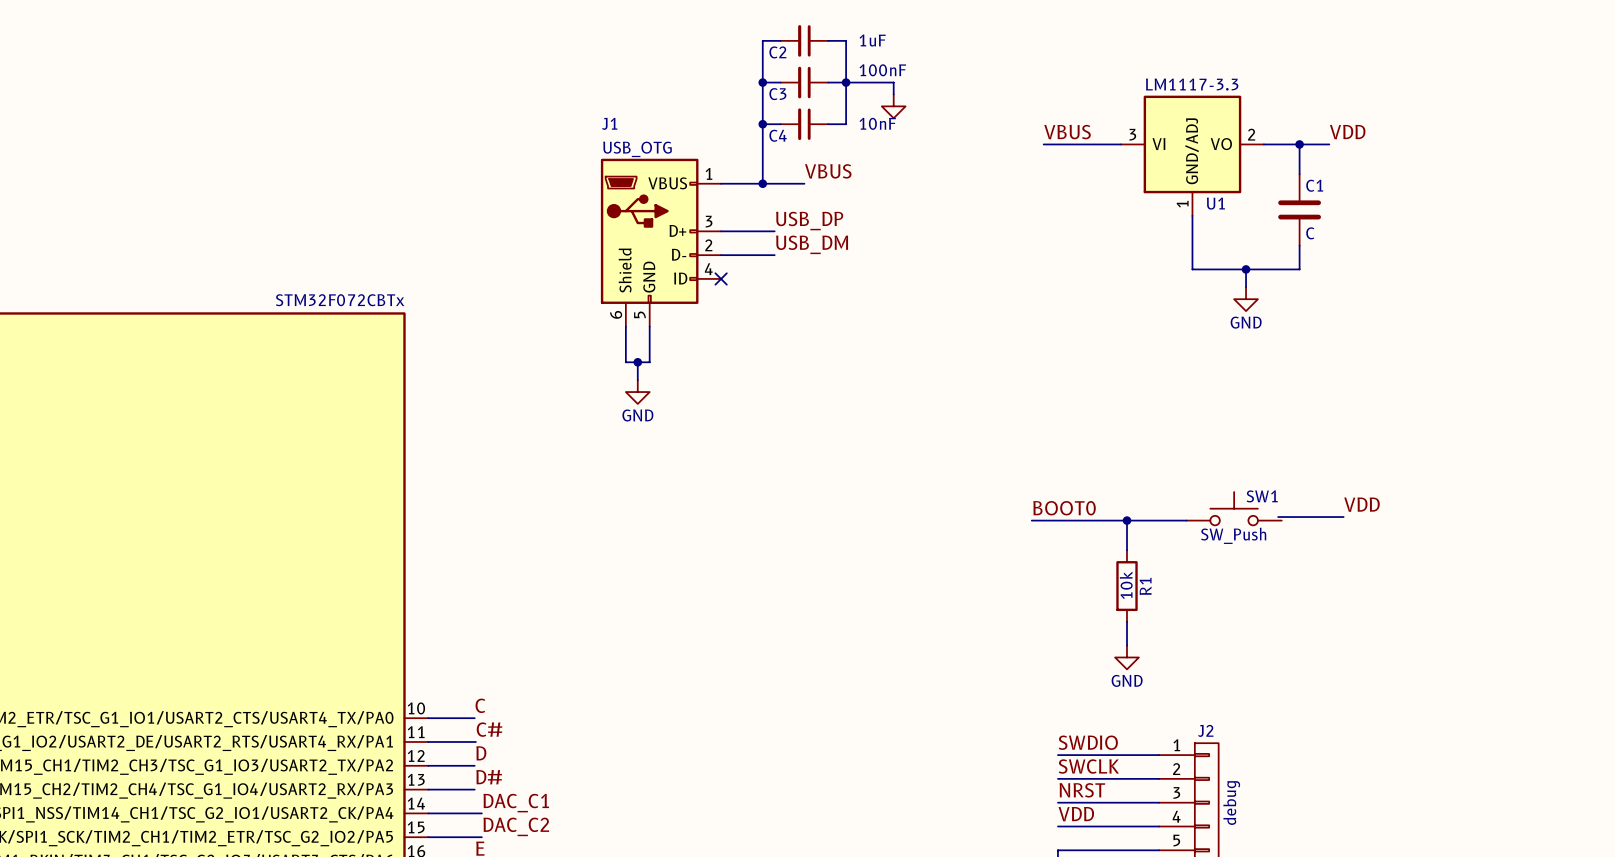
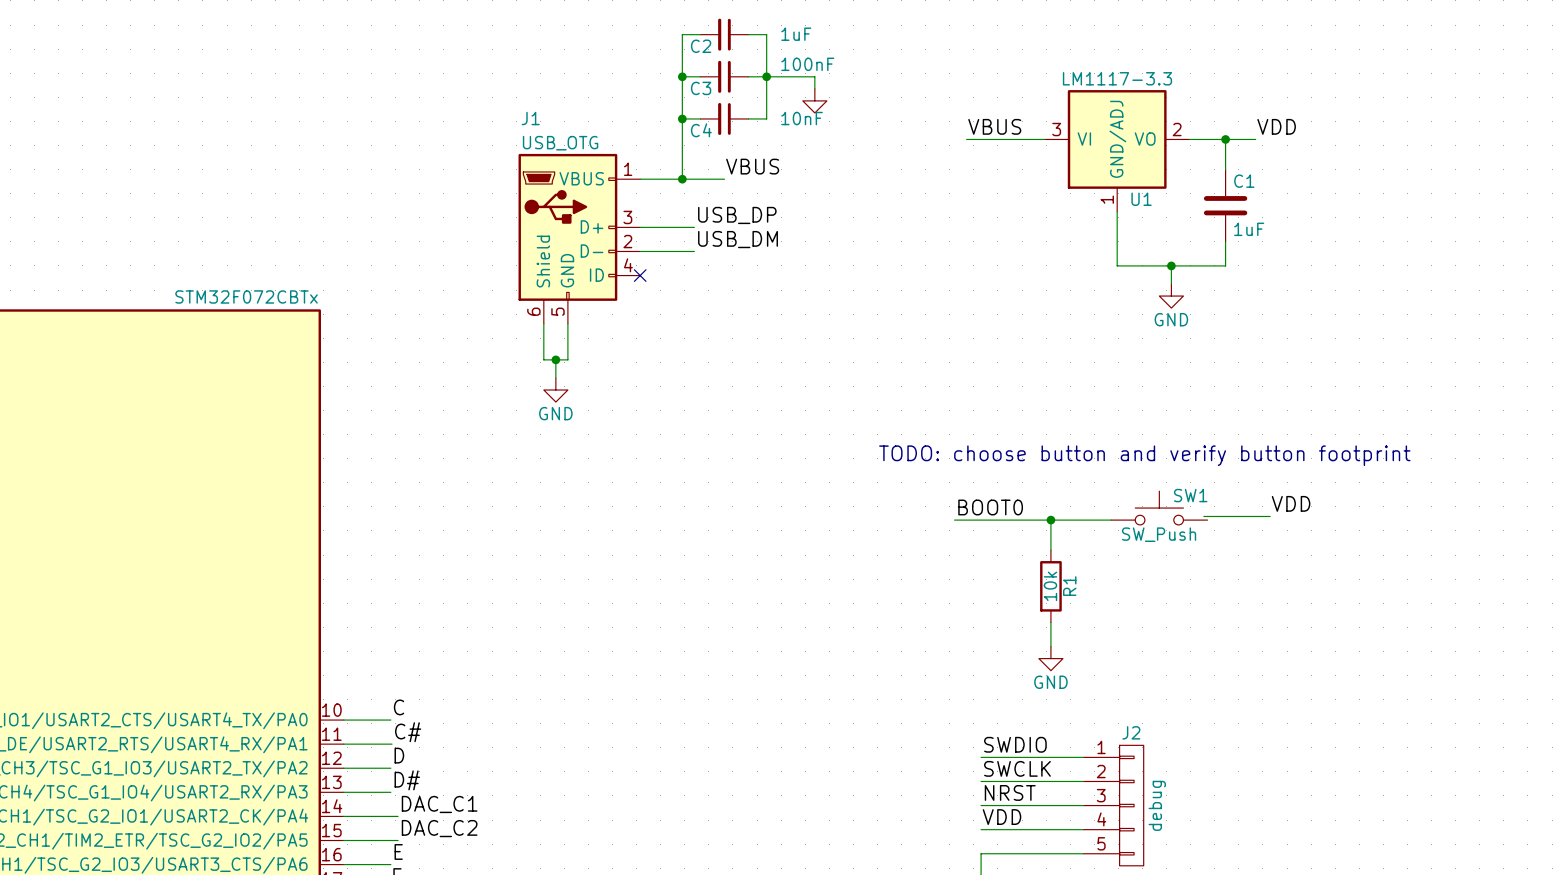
C1 value: C (1310, 233) -> 1uF (1249, 229)
text: none -> TODO: choose button and verify button footprint (1144, 455)

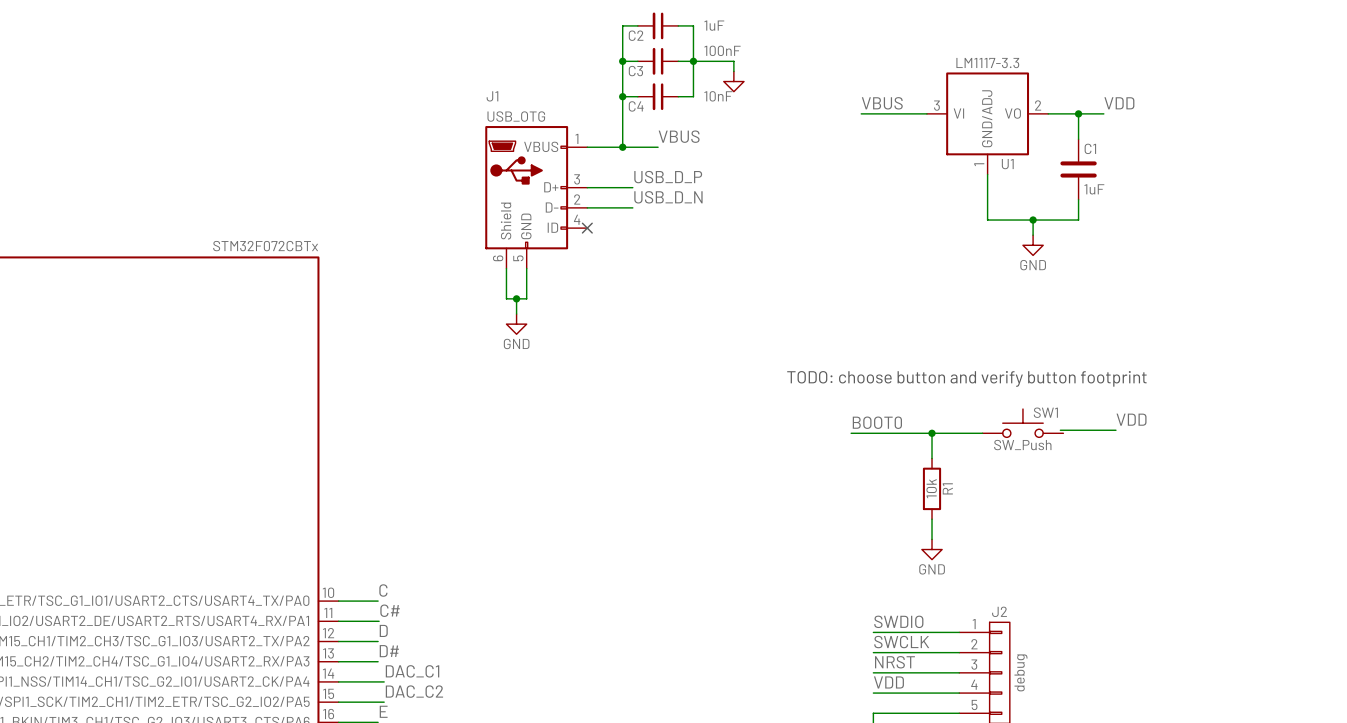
label: USB_DP (737, 215) -> USB_D_P (668, 177)
label: USB_DM (738, 239) -> USB_D_N (668, 197)

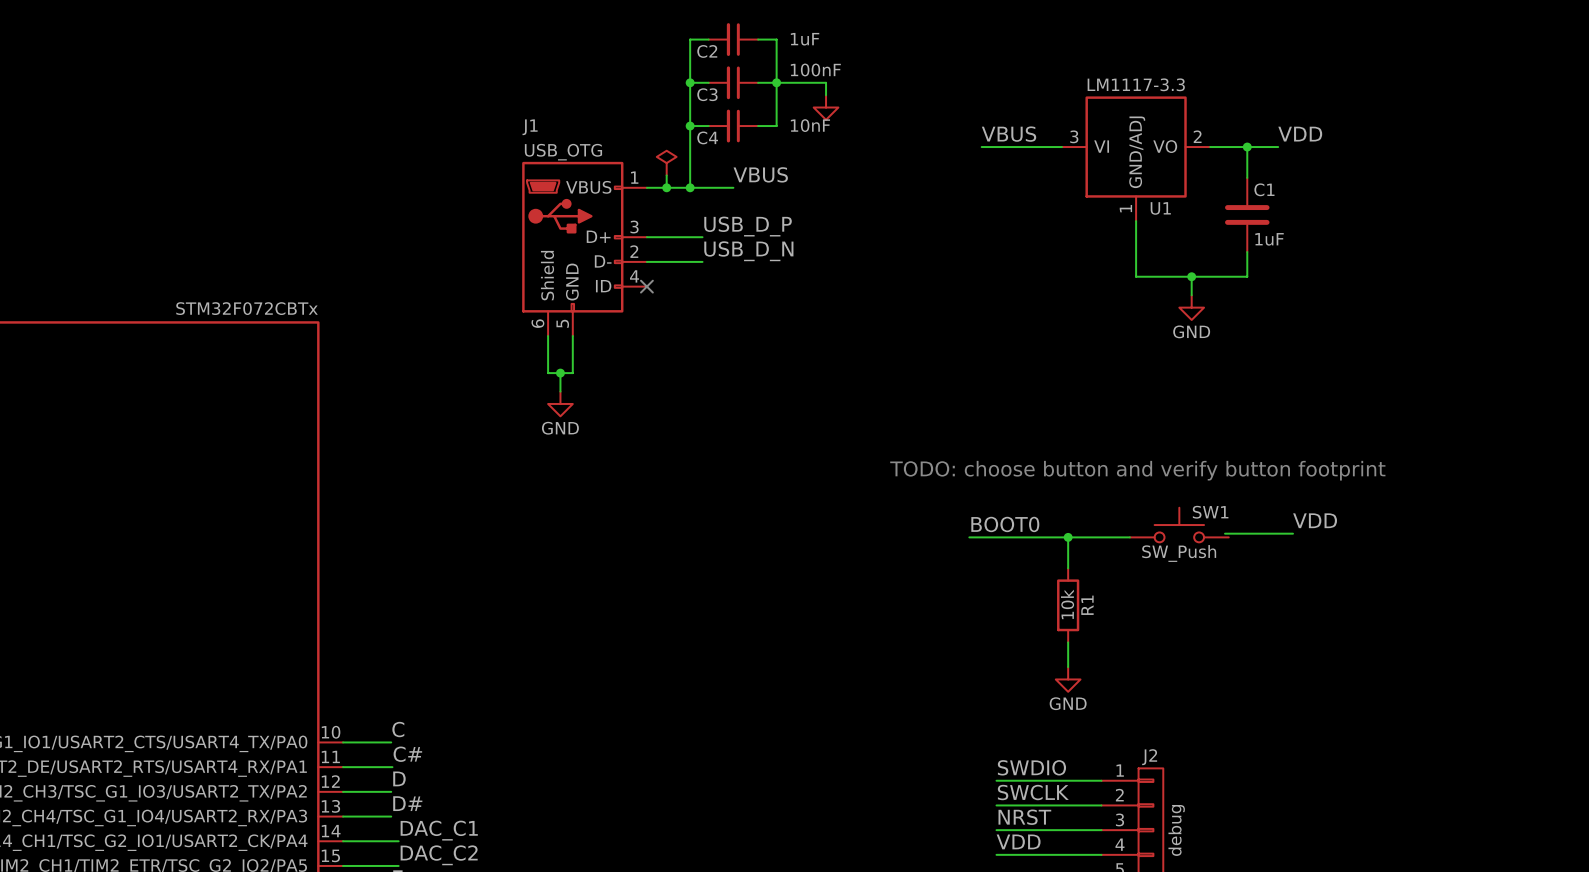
power symbol: none -> (666, 163)
wire: none -> (666, 175) (666, 187)
junction: none -> (666, 187)

